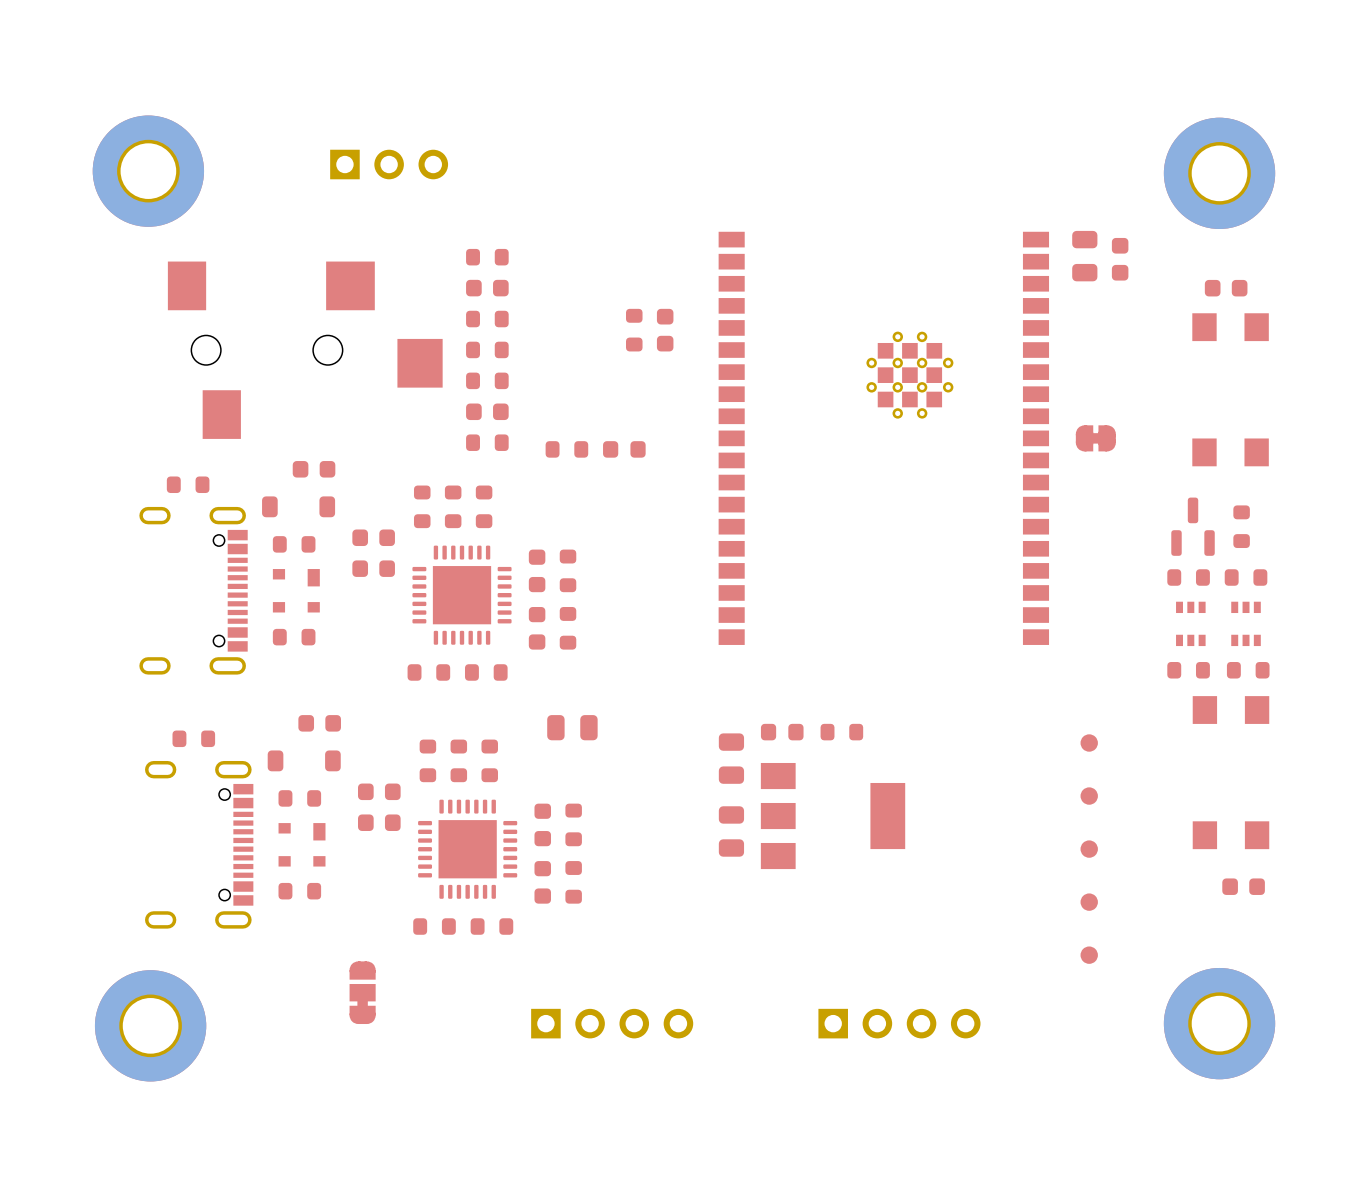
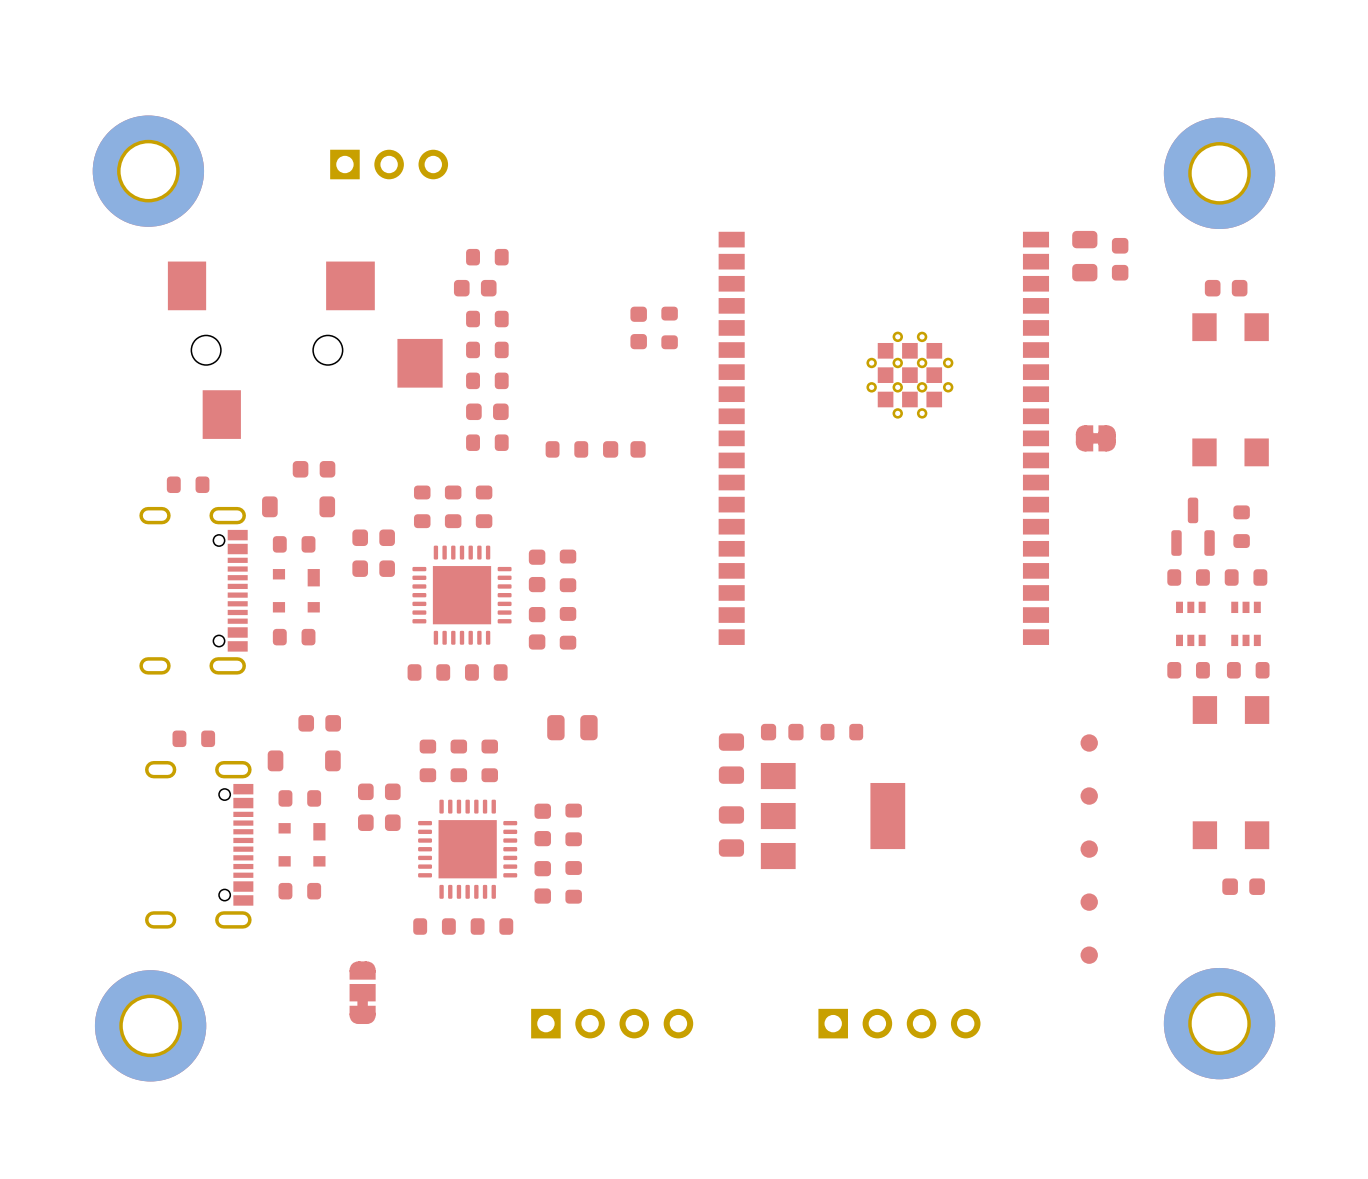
part position: (487, 288) -> (475, 288)
part footprint: [626, 308, 643, 352] -> [630, 306, 647, 350]
part footprint: [656, 308, 674, 352] -> [661, 306, 678, 350]

